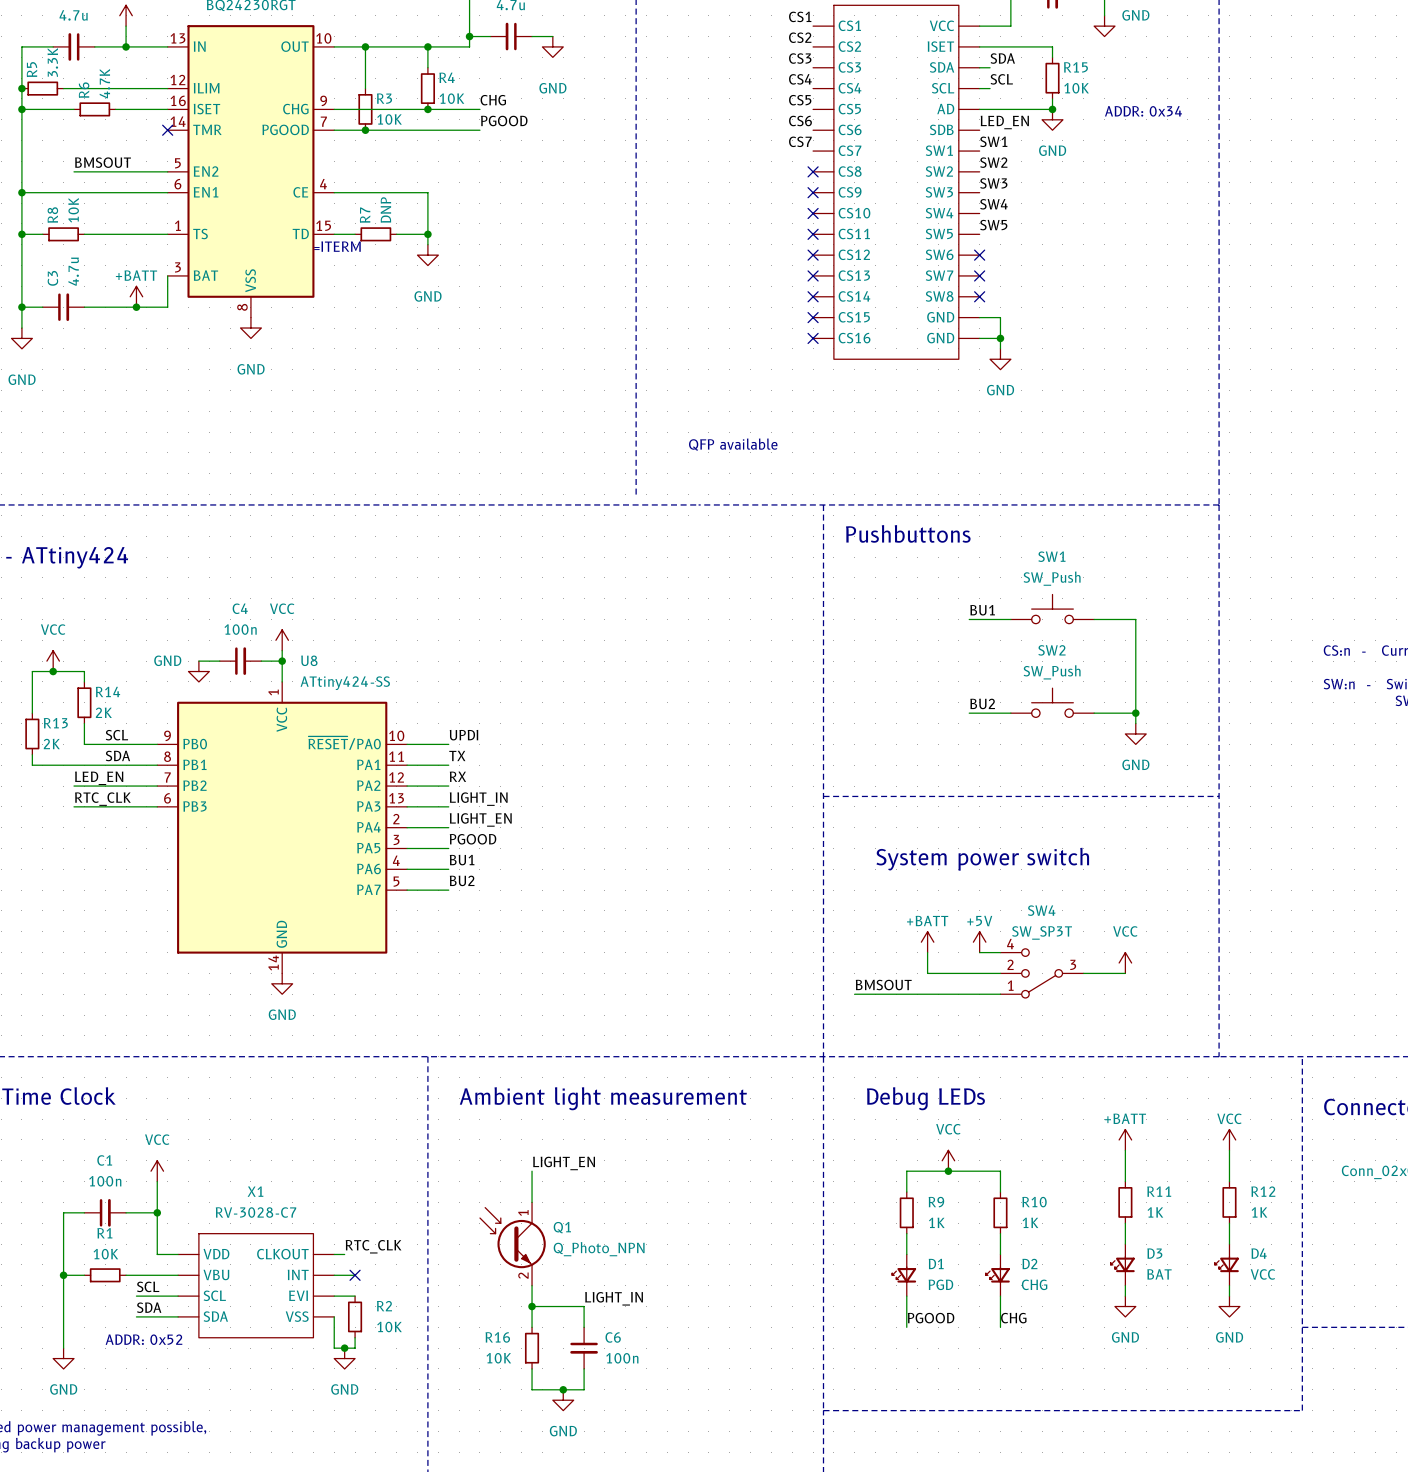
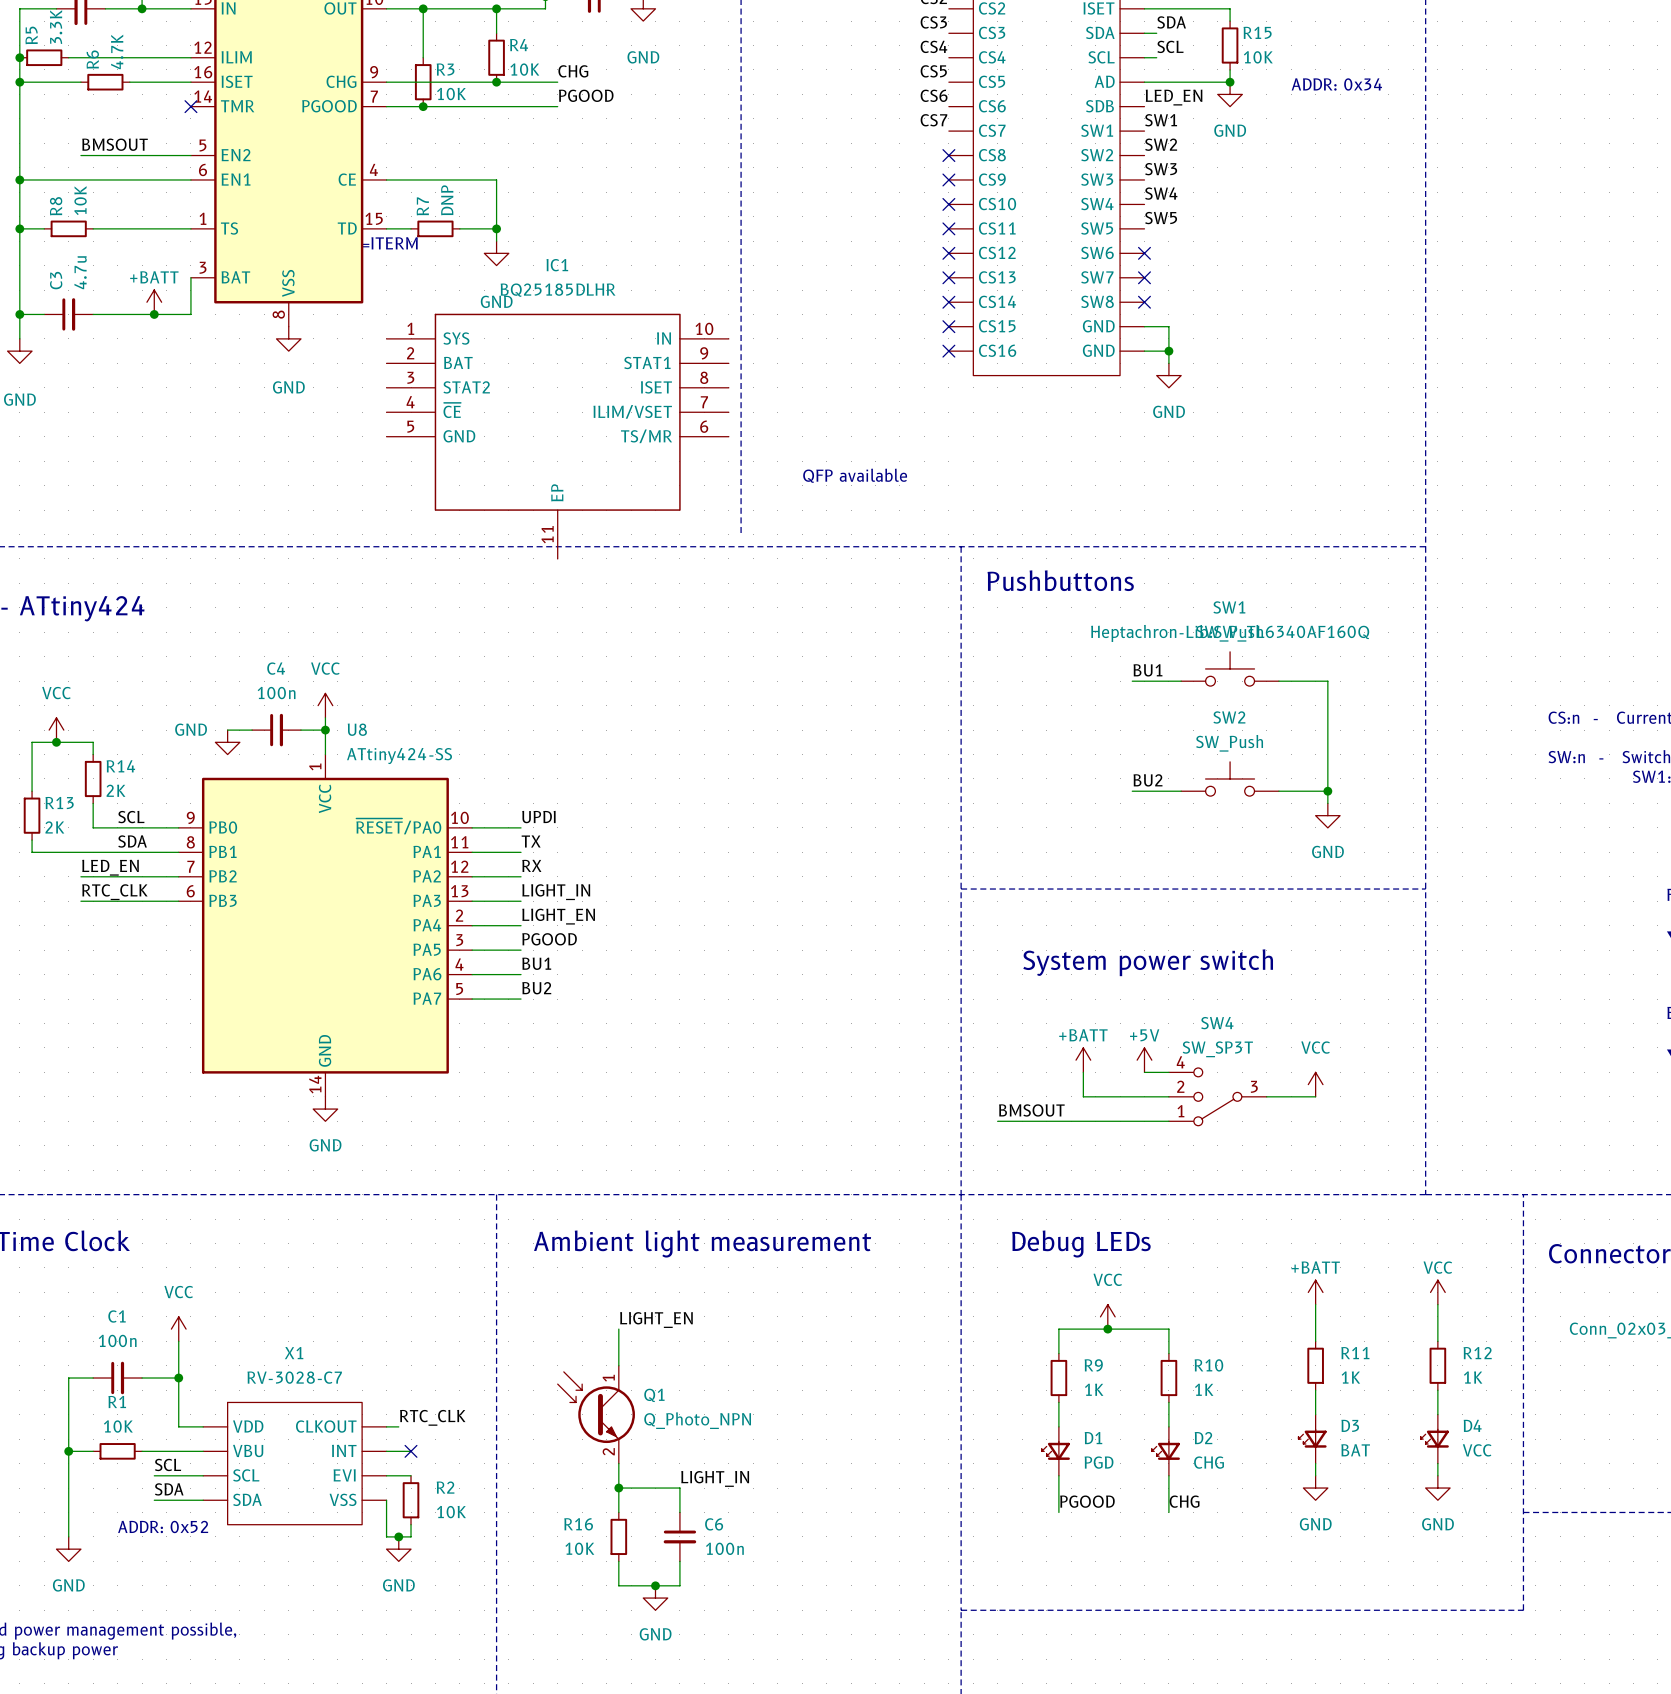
IC1: none -> BQ25185DLHR (557, 436)
SW1 text: none -> Heptachron-Lib:SW_TL6340AF160Q (1230, 633)

